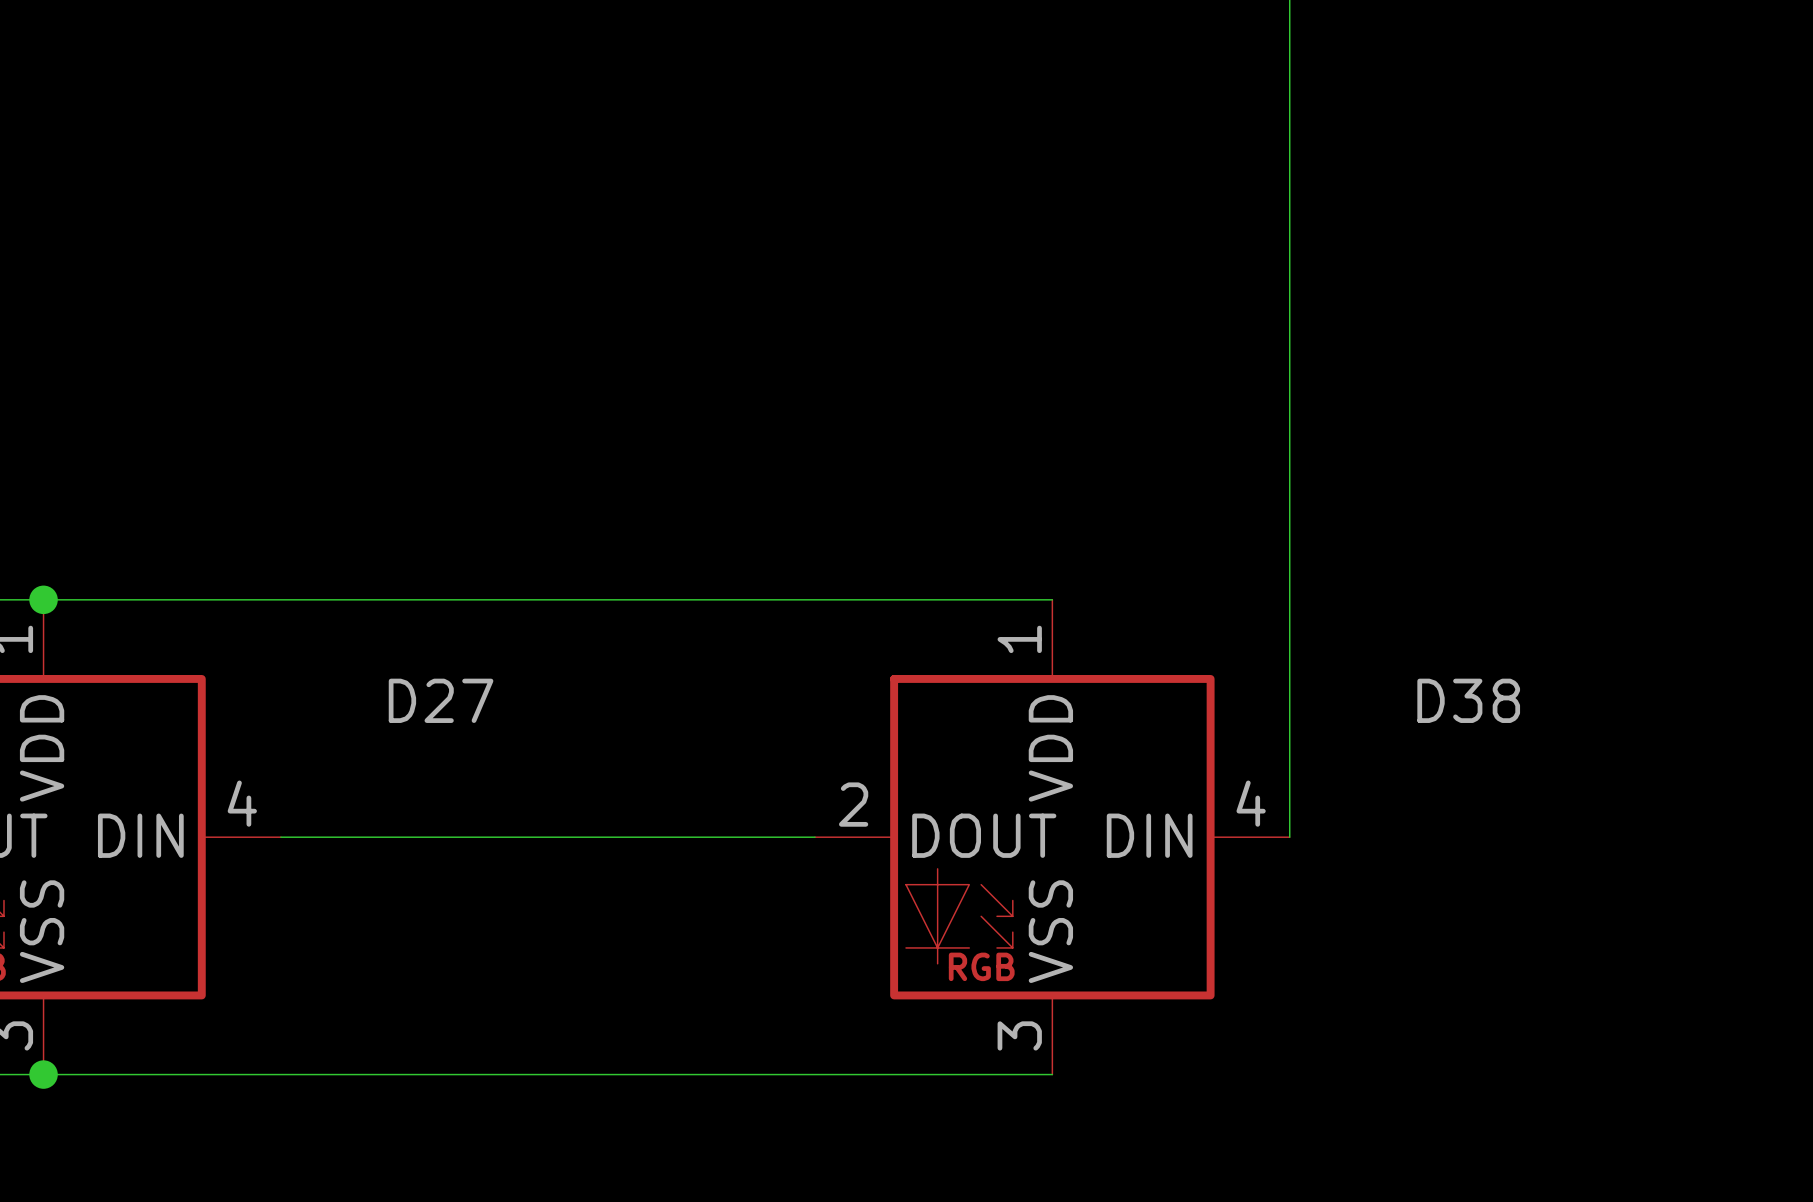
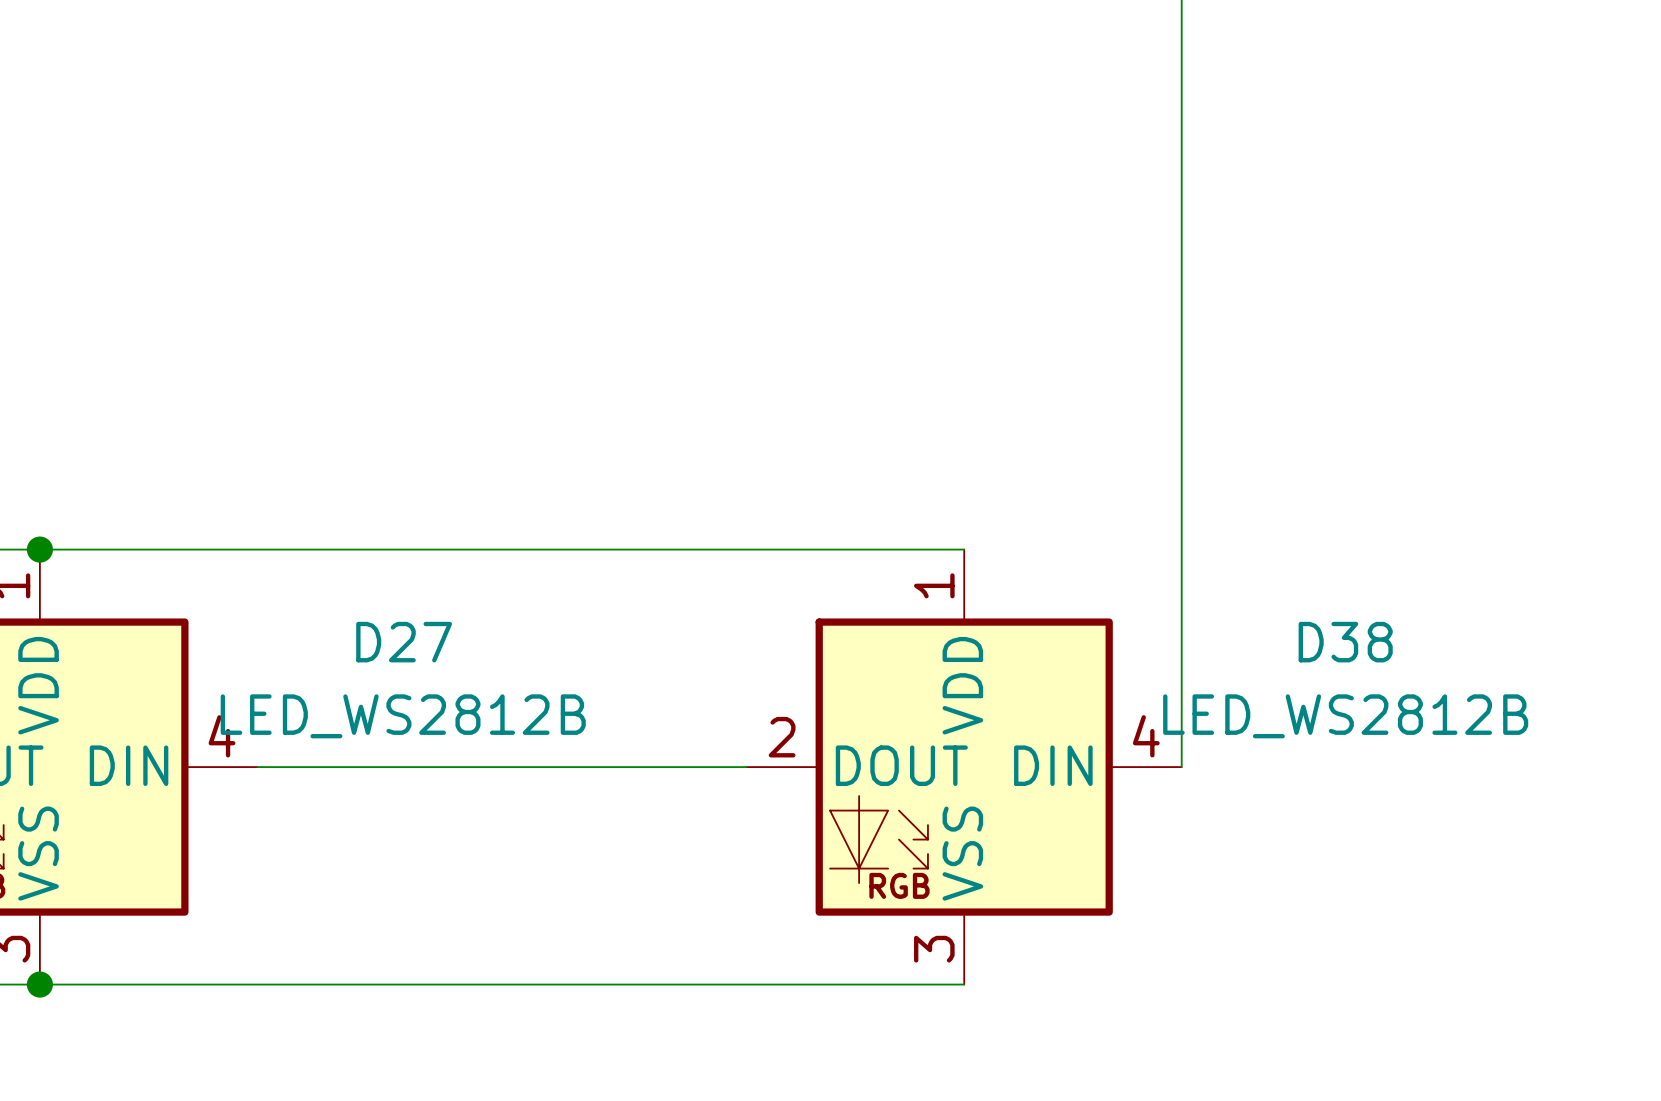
D27 value: none -> LED_WS2812B (403, 716)
D38 value: none -> LED_WS2812B (1345, 716)

